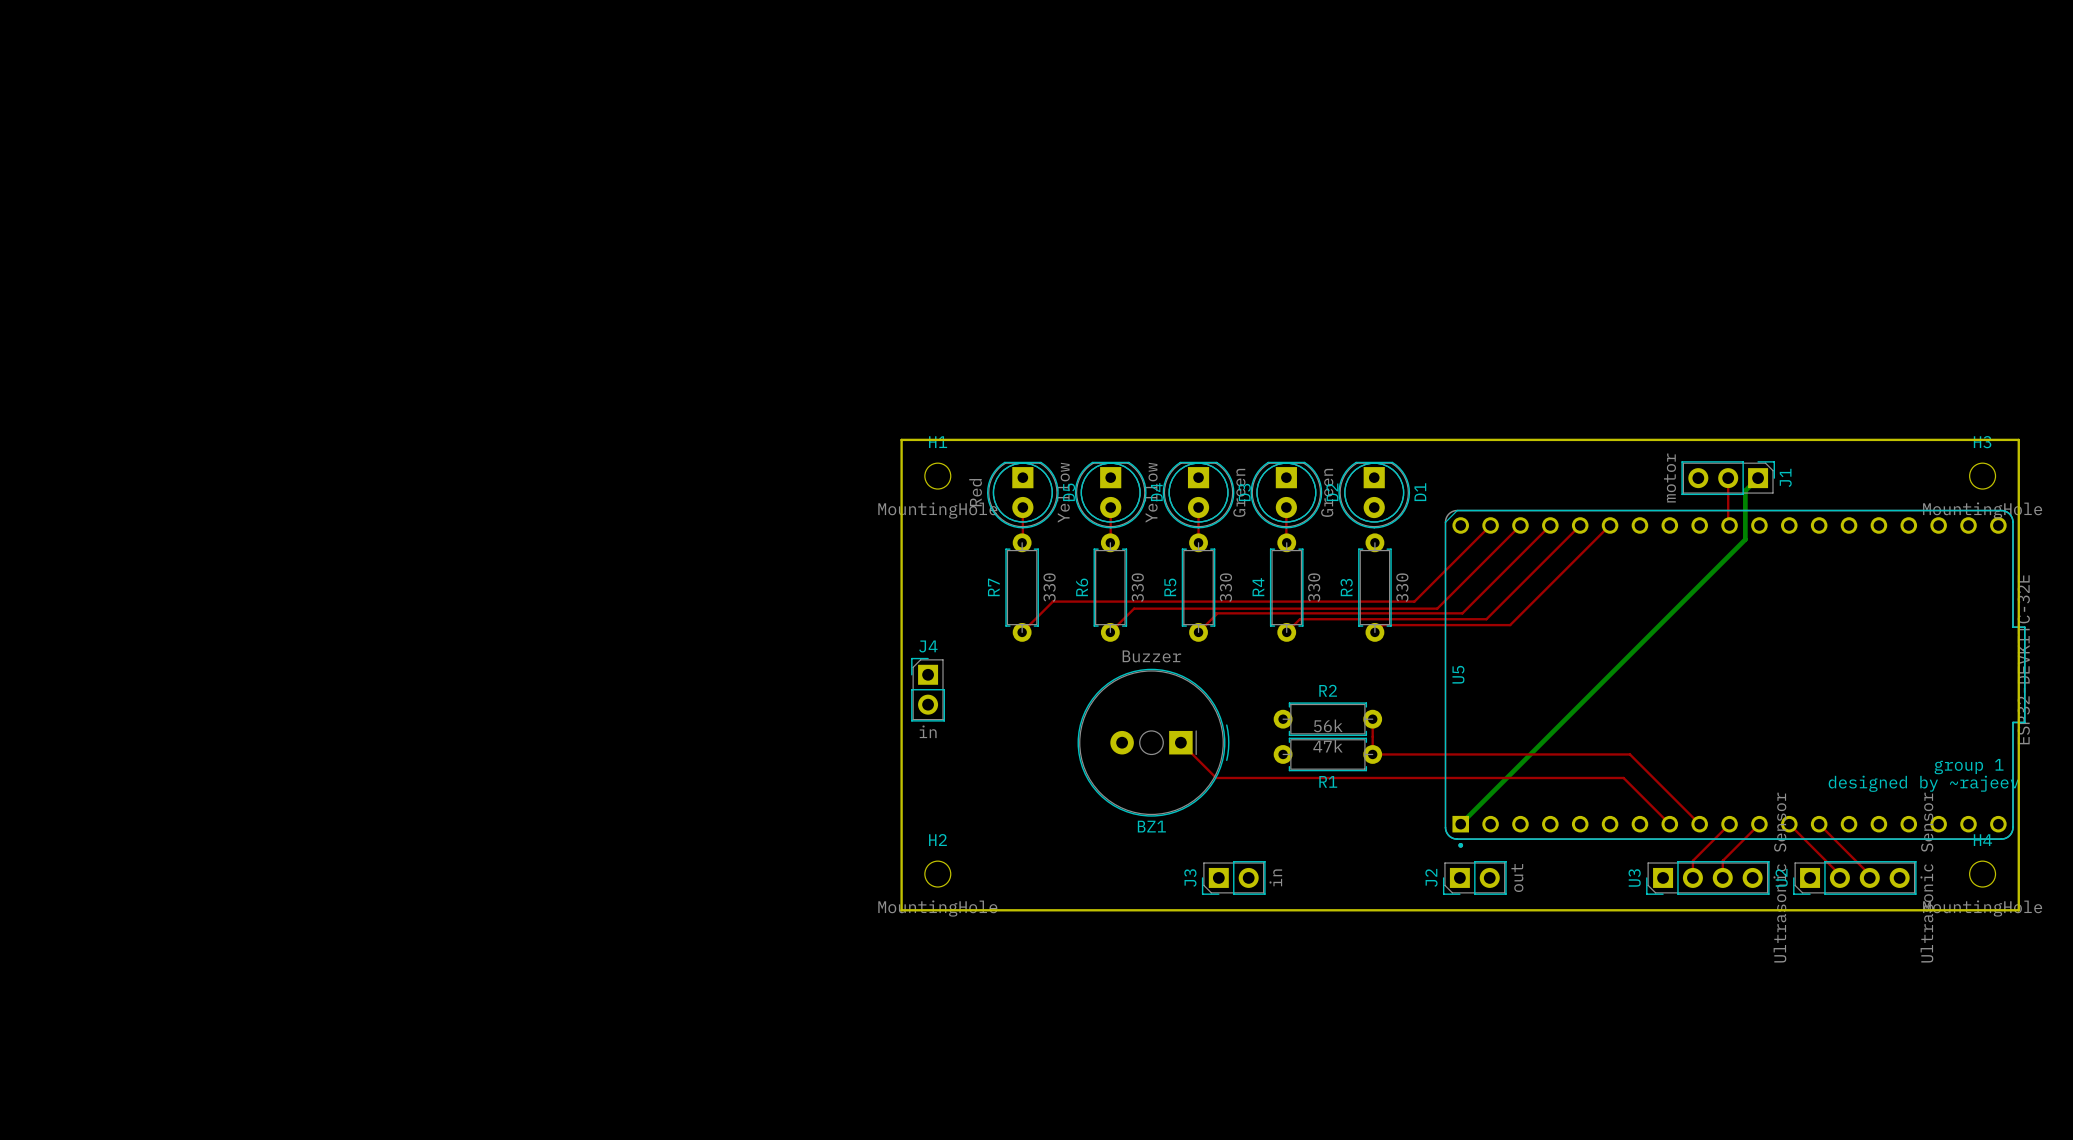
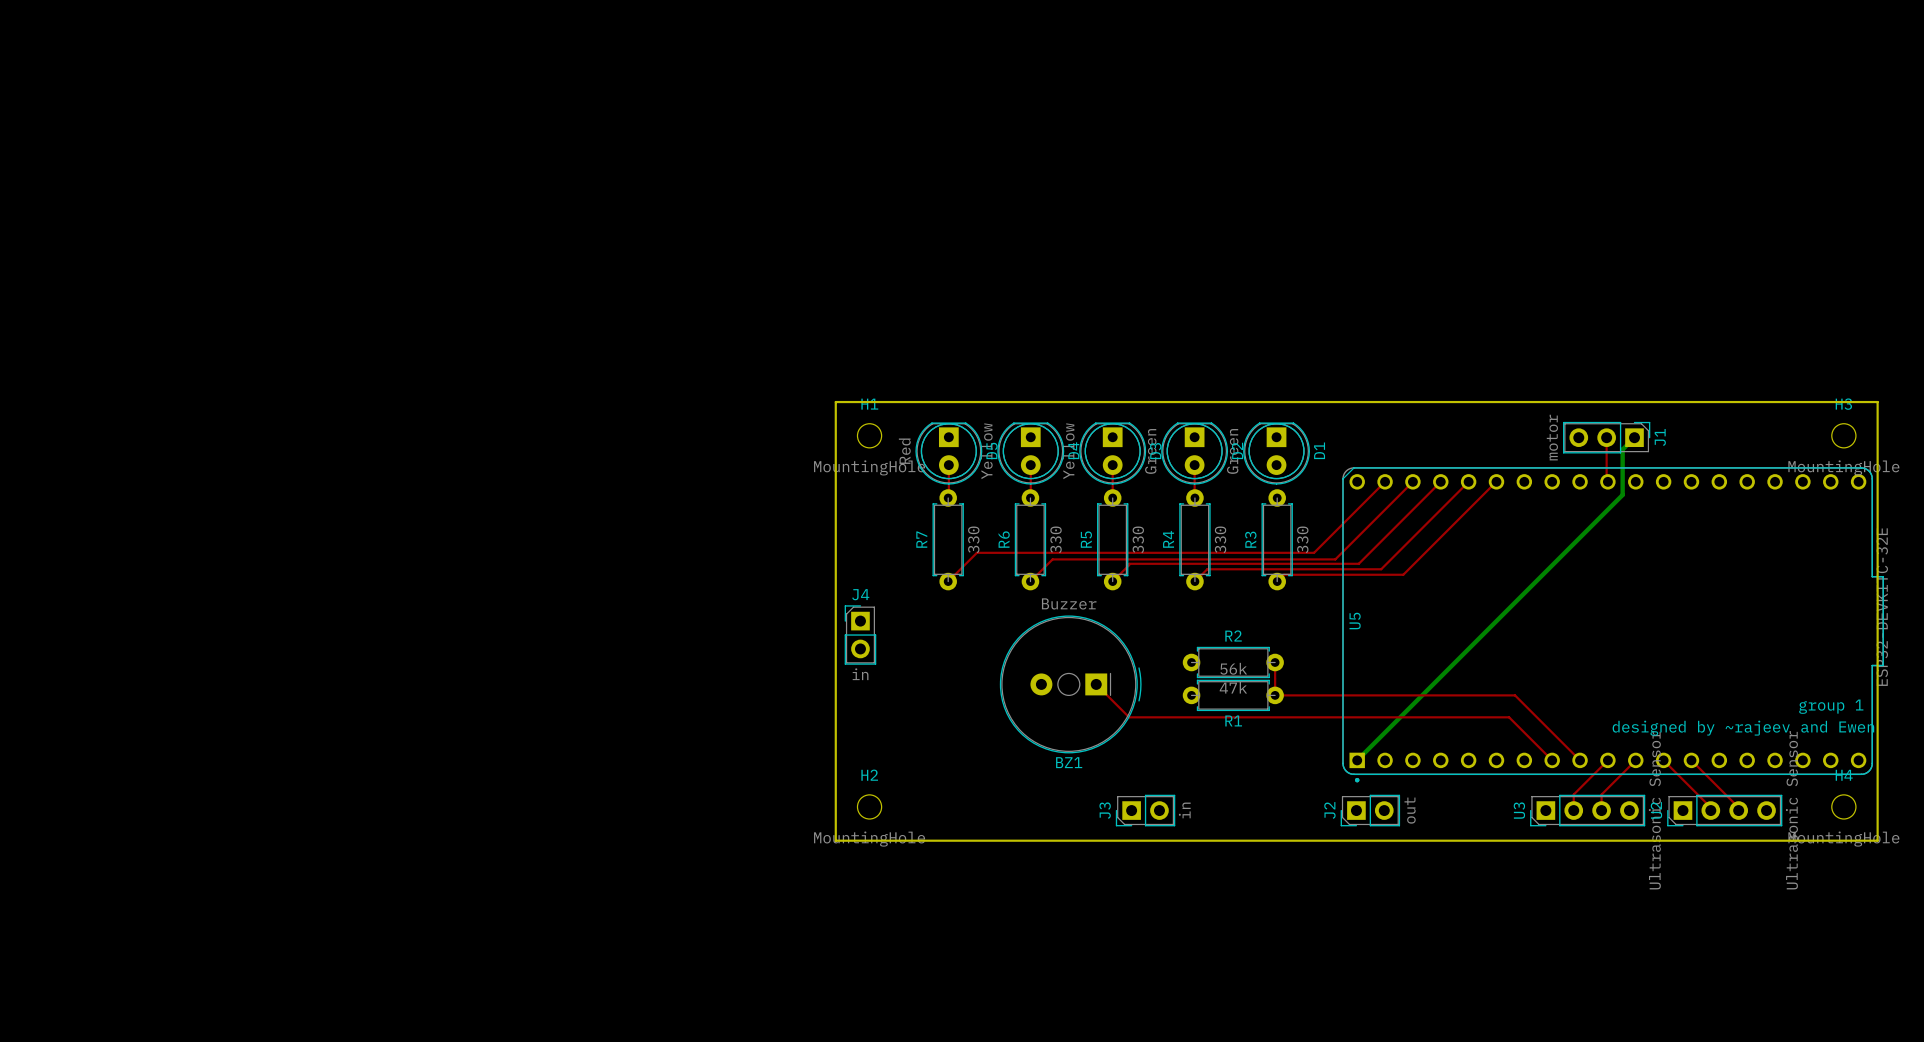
text: designed by ~rajeev (1923, 783) -> designed by ~rajeev and Ewen (1743, 728)

